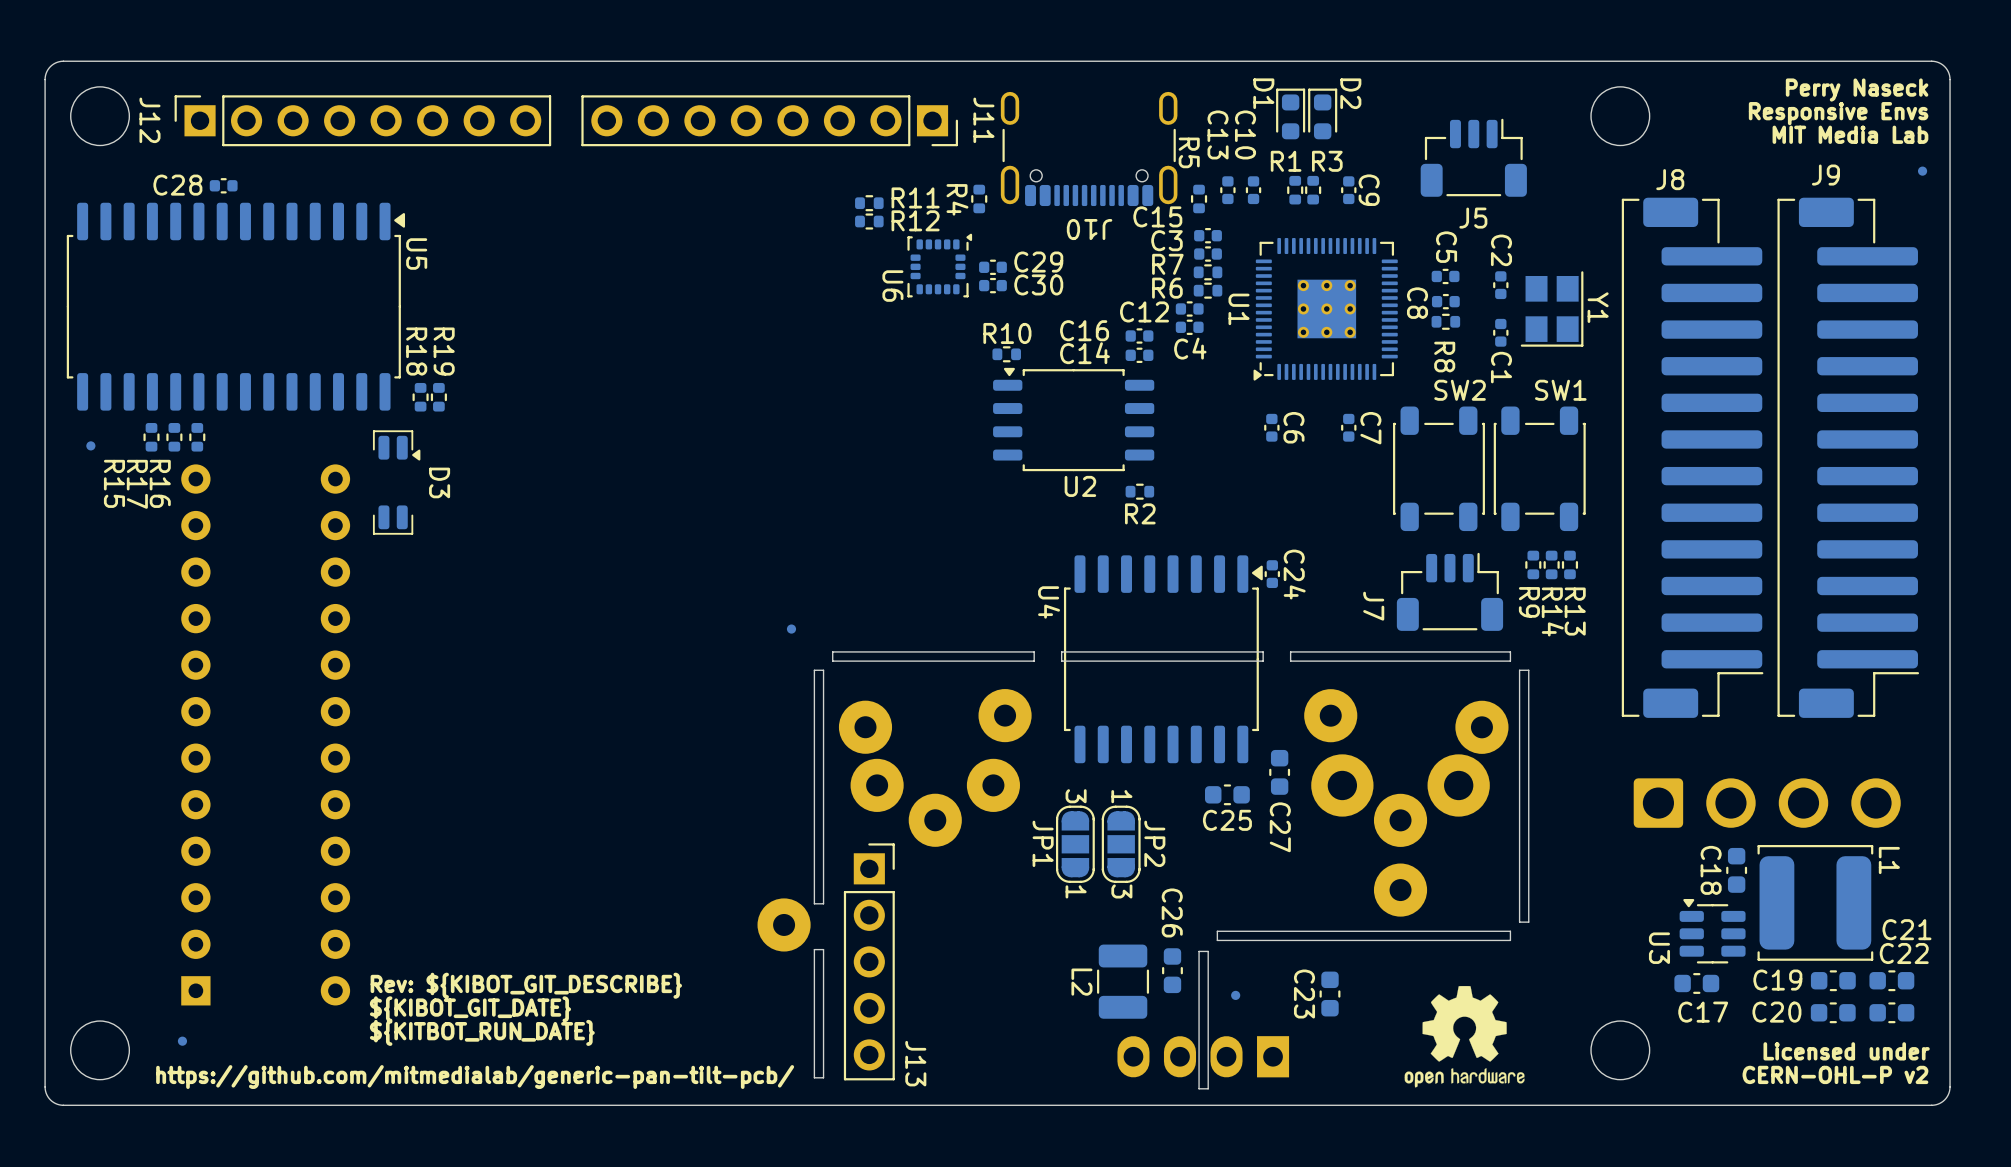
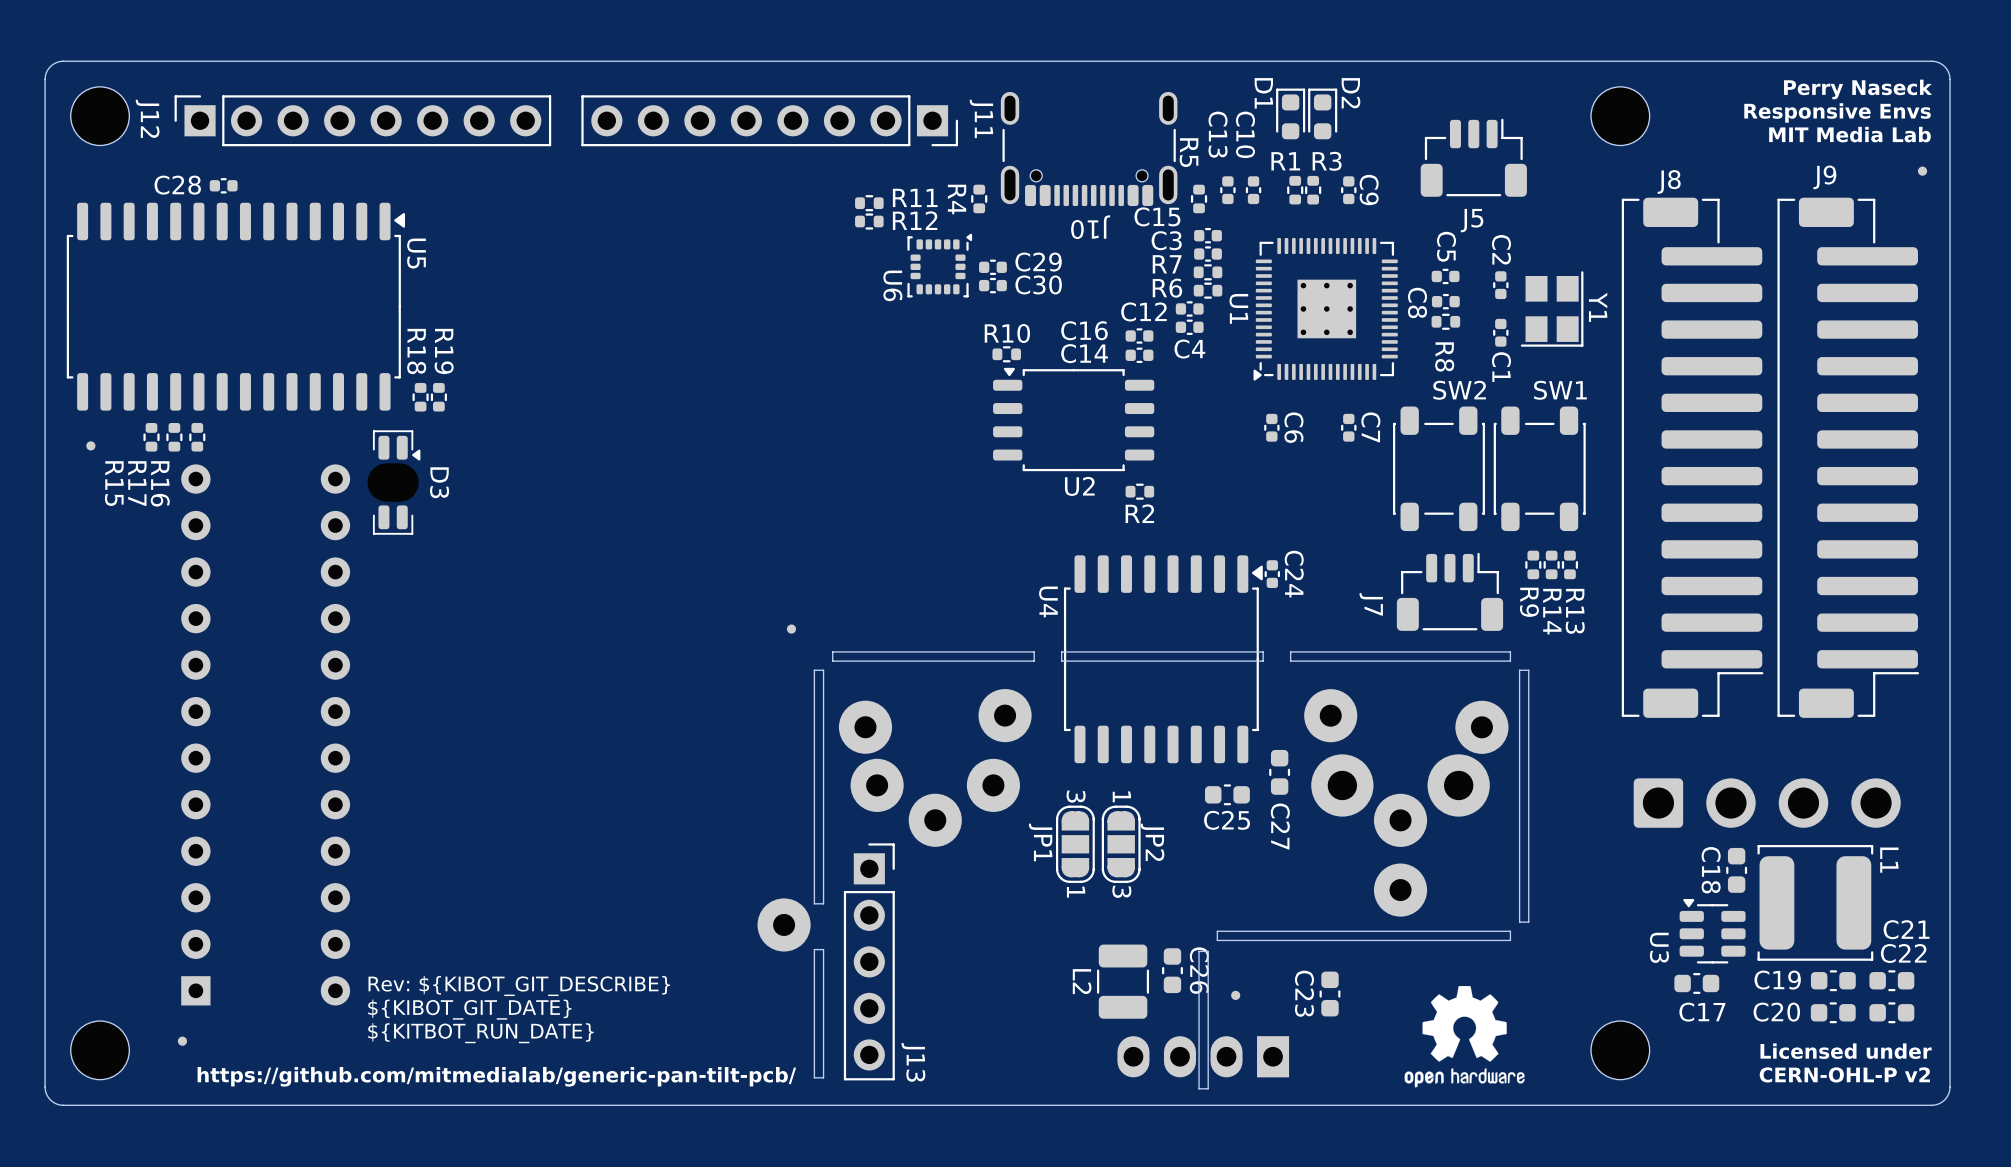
C26 name position: C26 (1172, 912) -> C26 (1199, 970)

